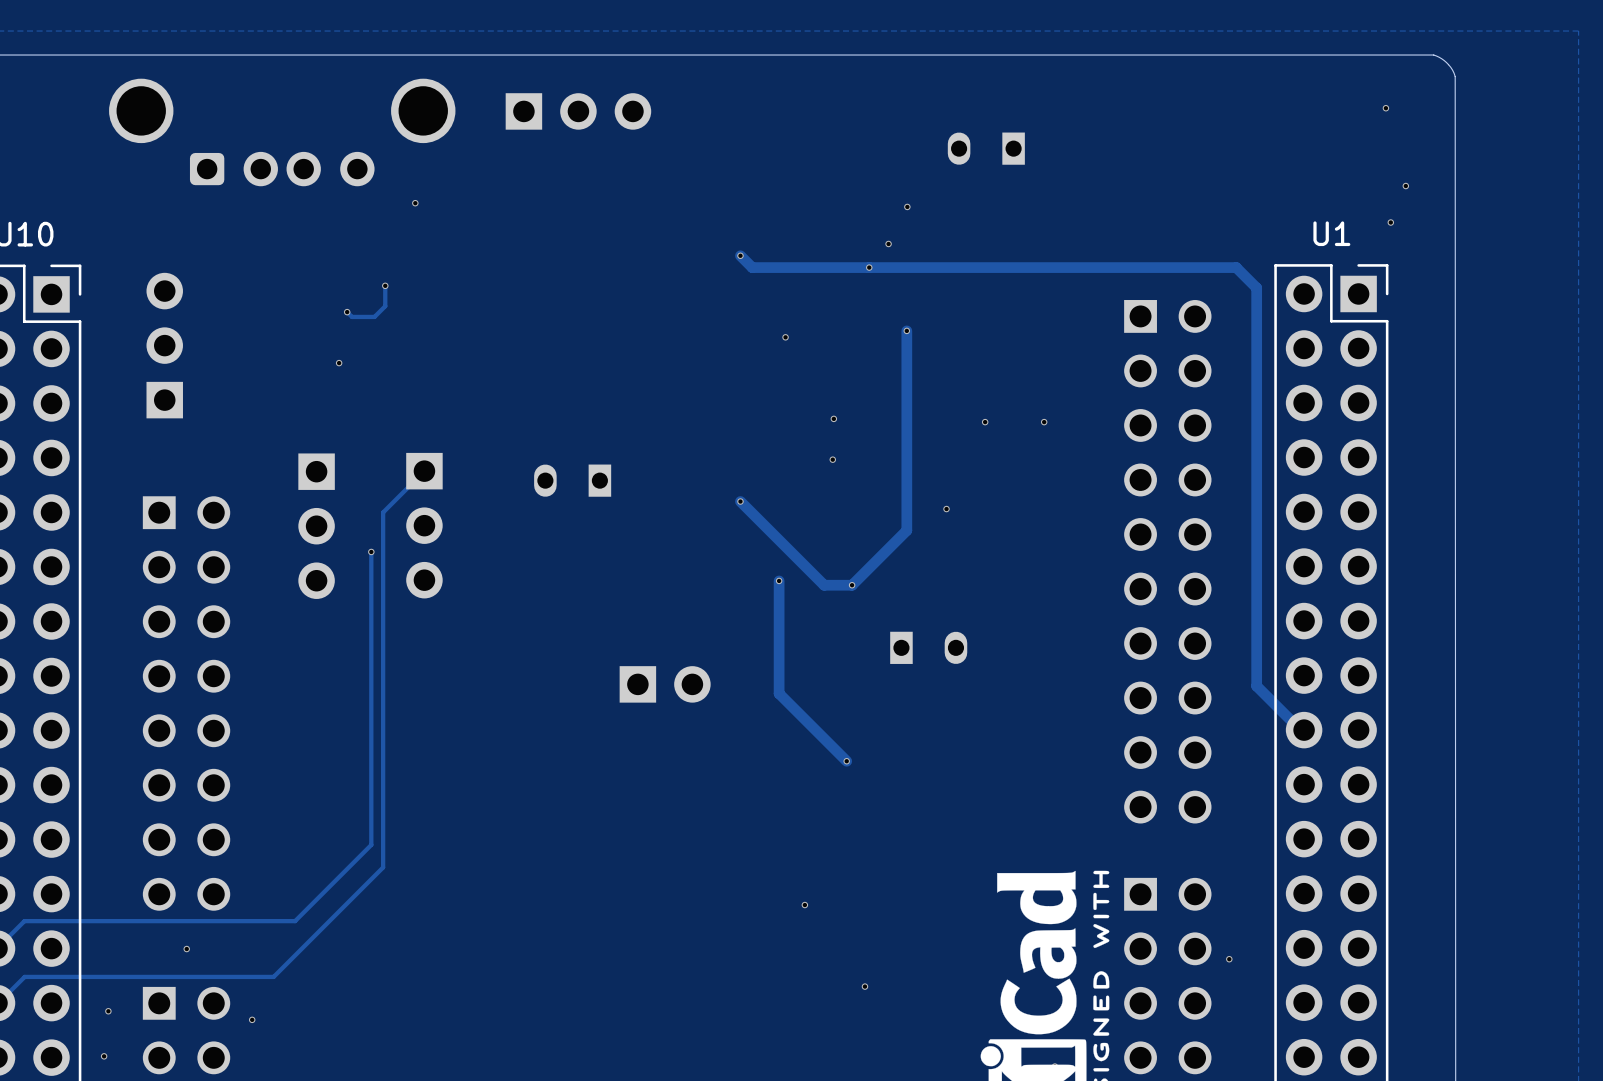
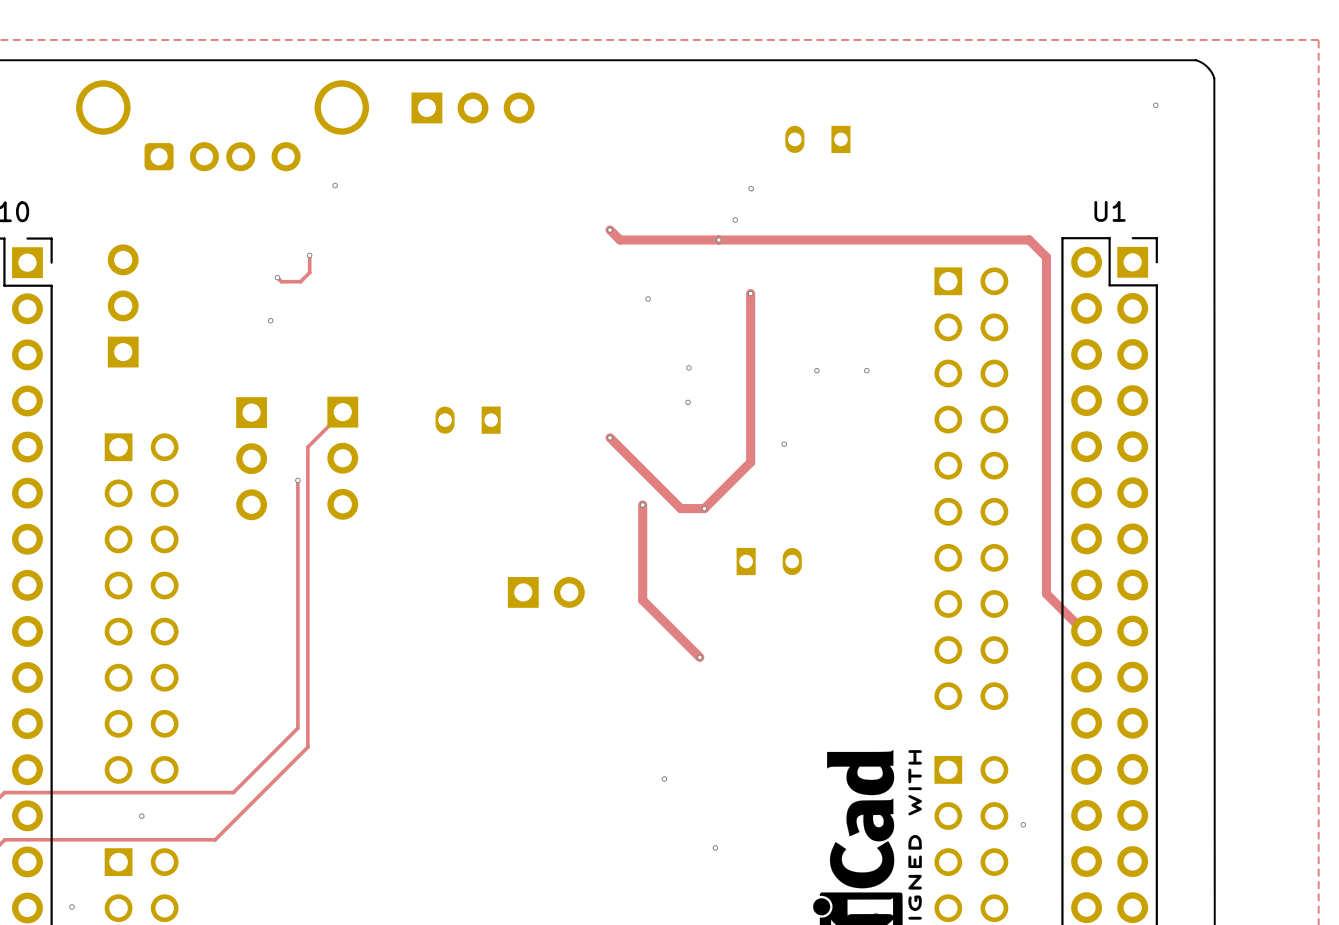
via: (1405, 186) -> none
via: (1390, 222) -> none
via: (108, 1011) -> none
via: (252, 1019) -> none

